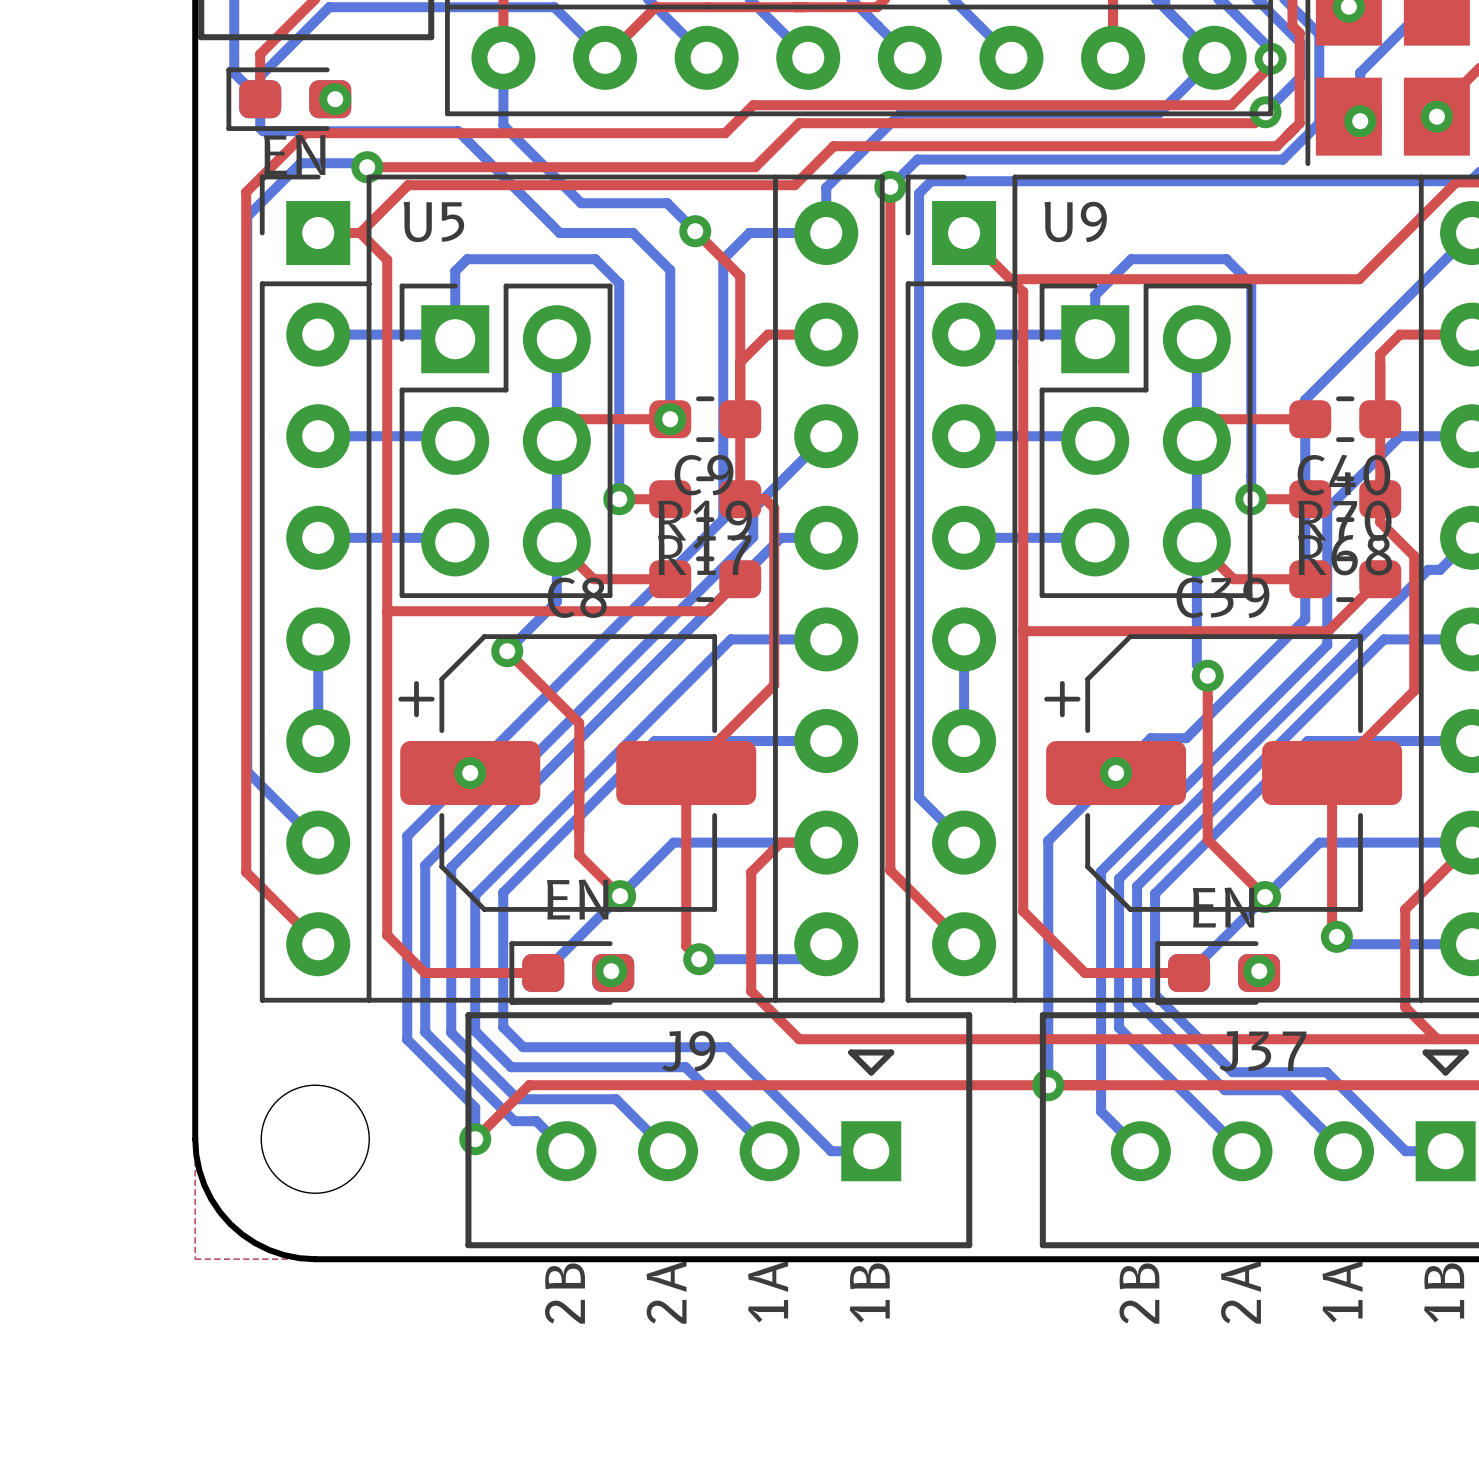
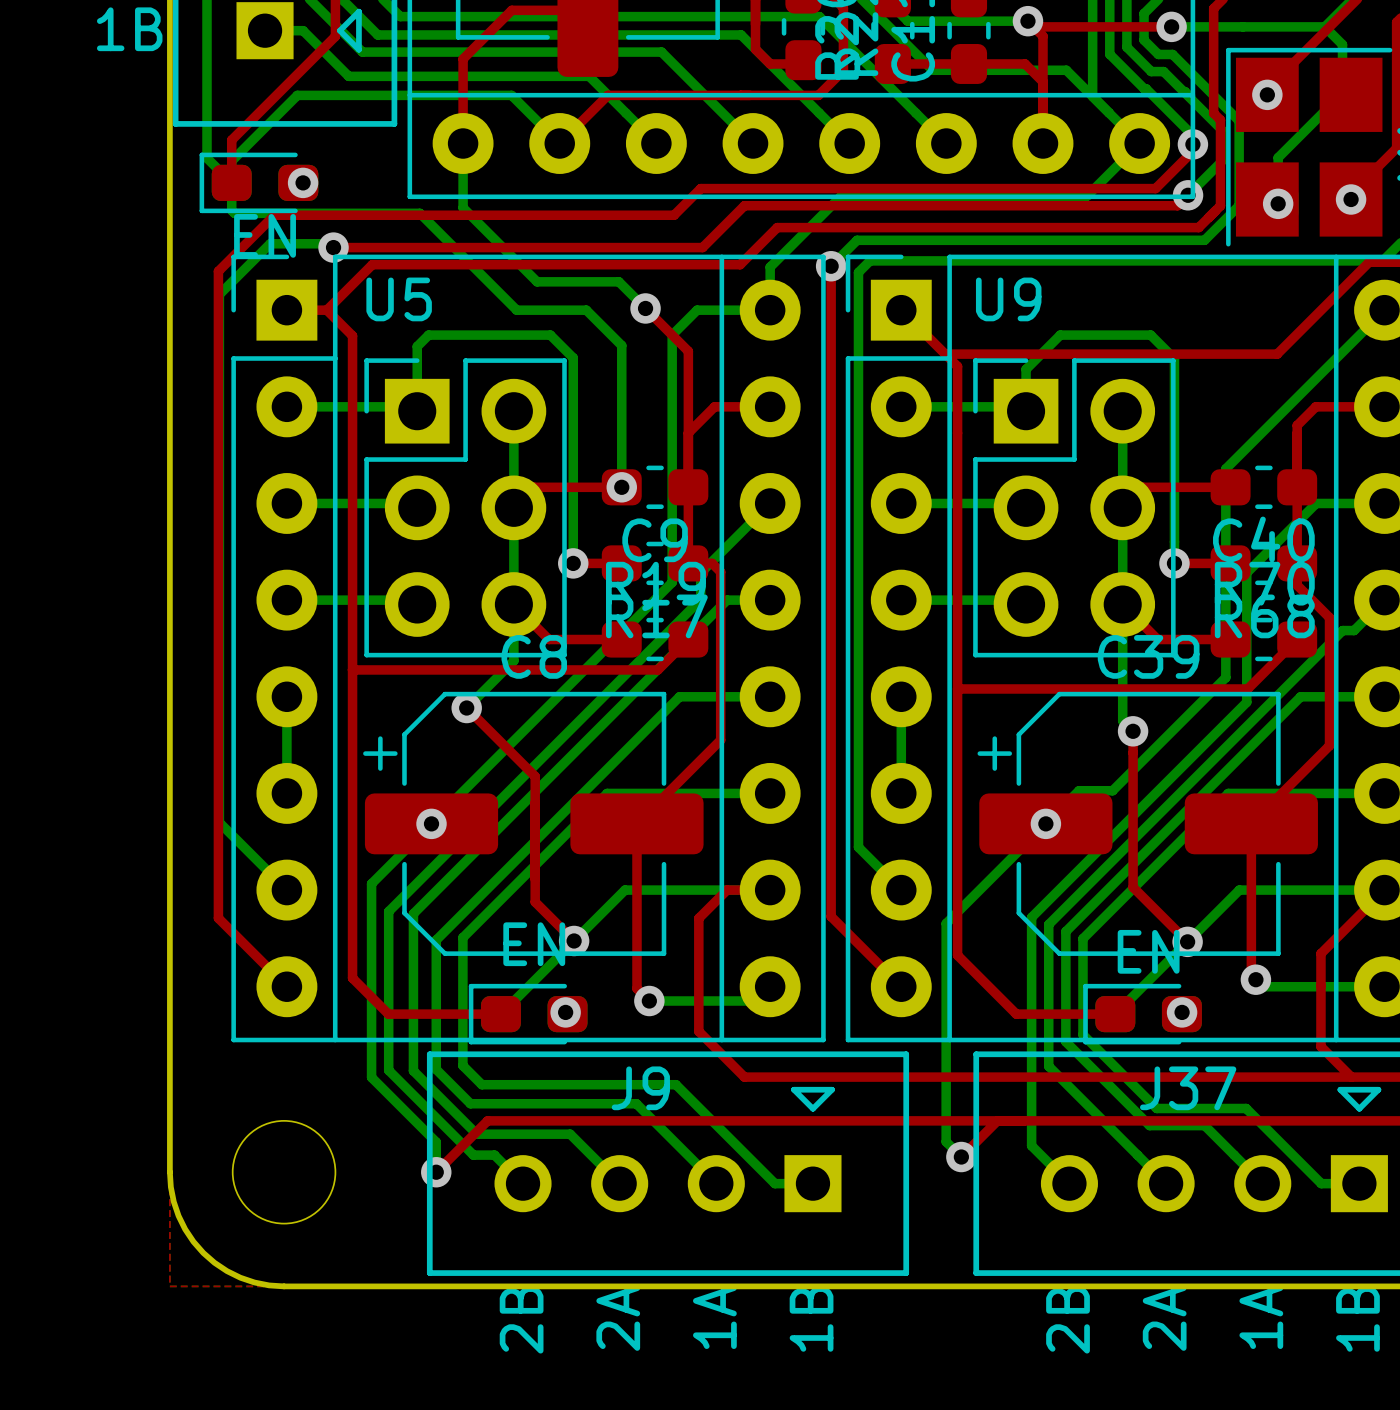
bottom track: (1048, 840) (1048, 1085) -> (981, 888) (946, 923) (946, 1141) (961, 1157)
via position: (1048, 1085) -> (961, 1157)
top track: none -> (997, 1120) (961, 1157)

